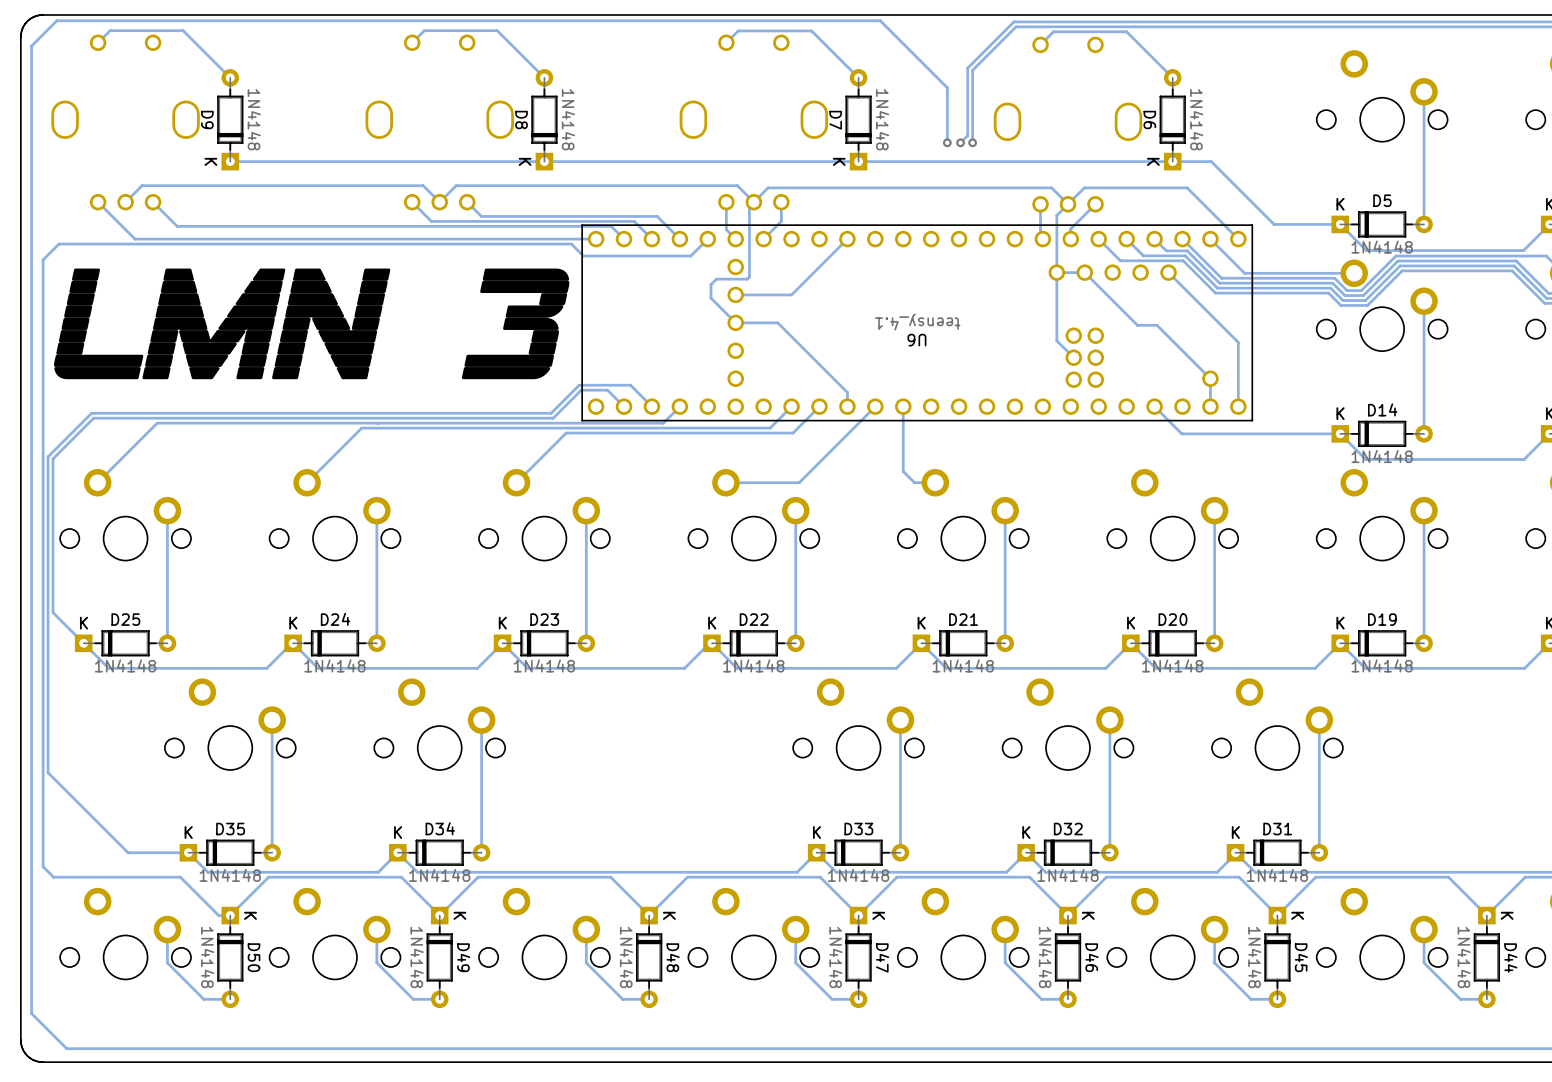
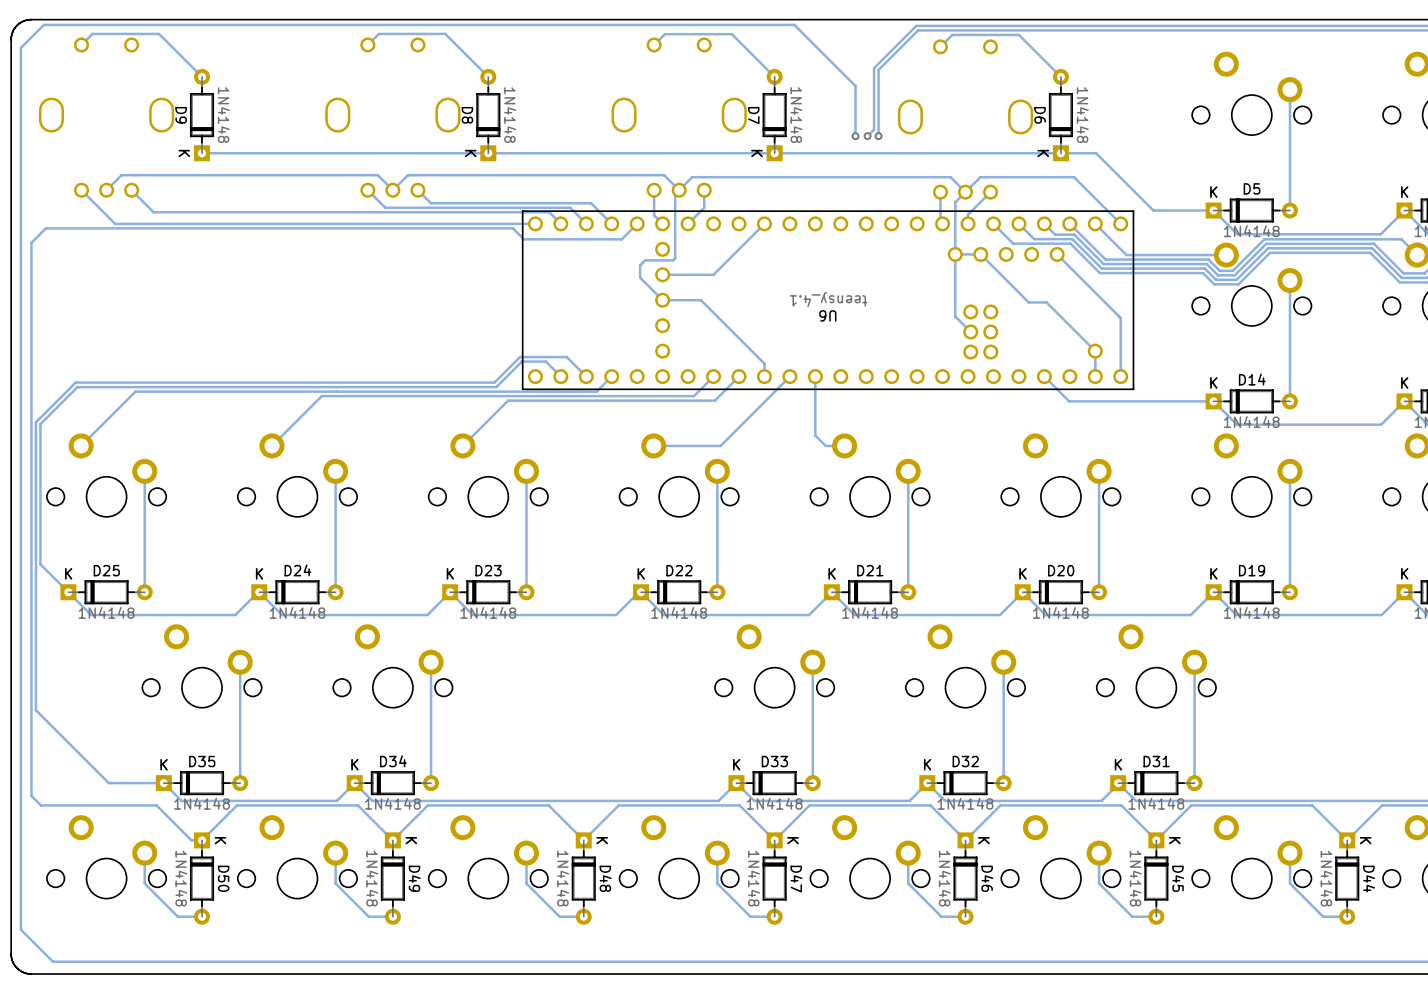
drawing: [54, 268, 391, 380] -> none
drawing: [461, 268, 570, 380] -> none

